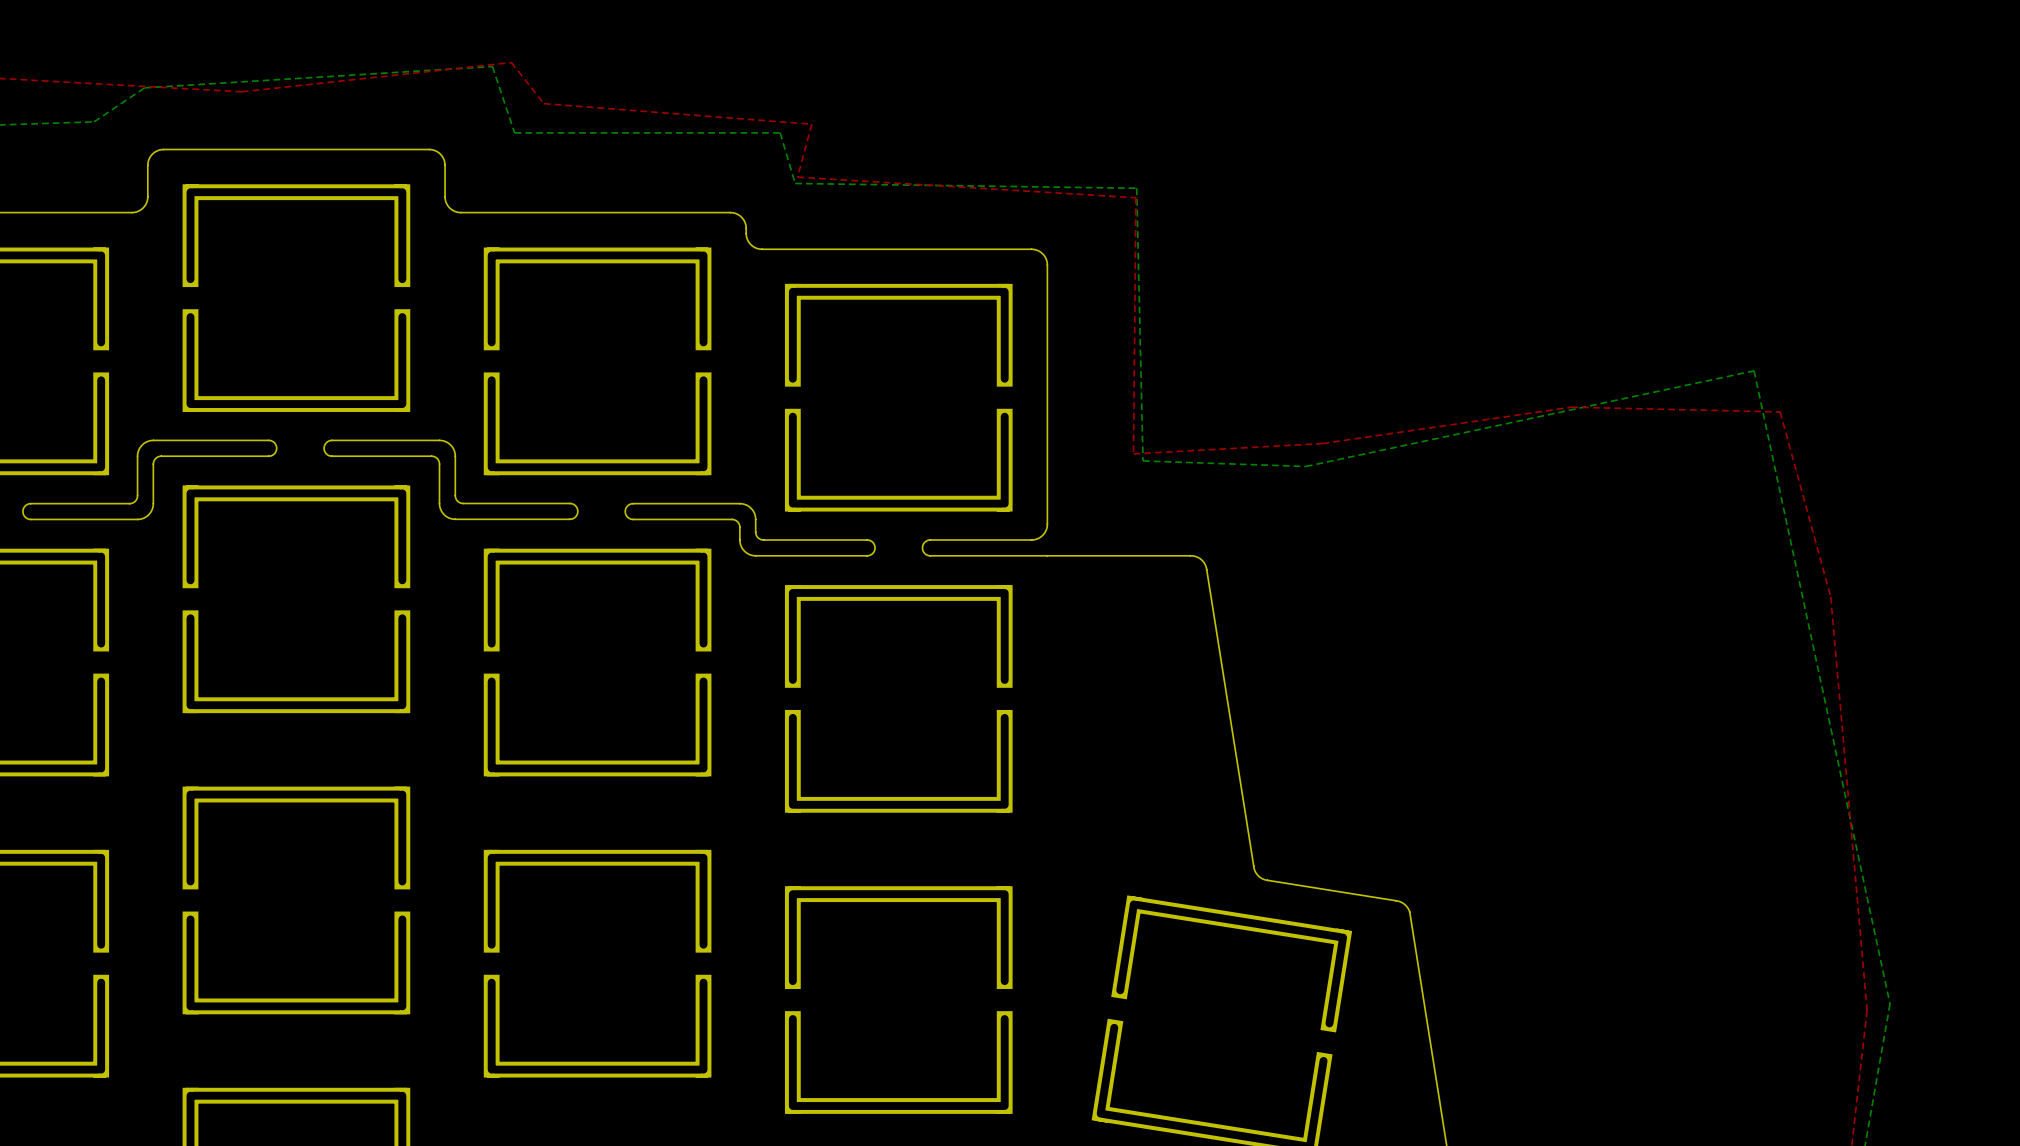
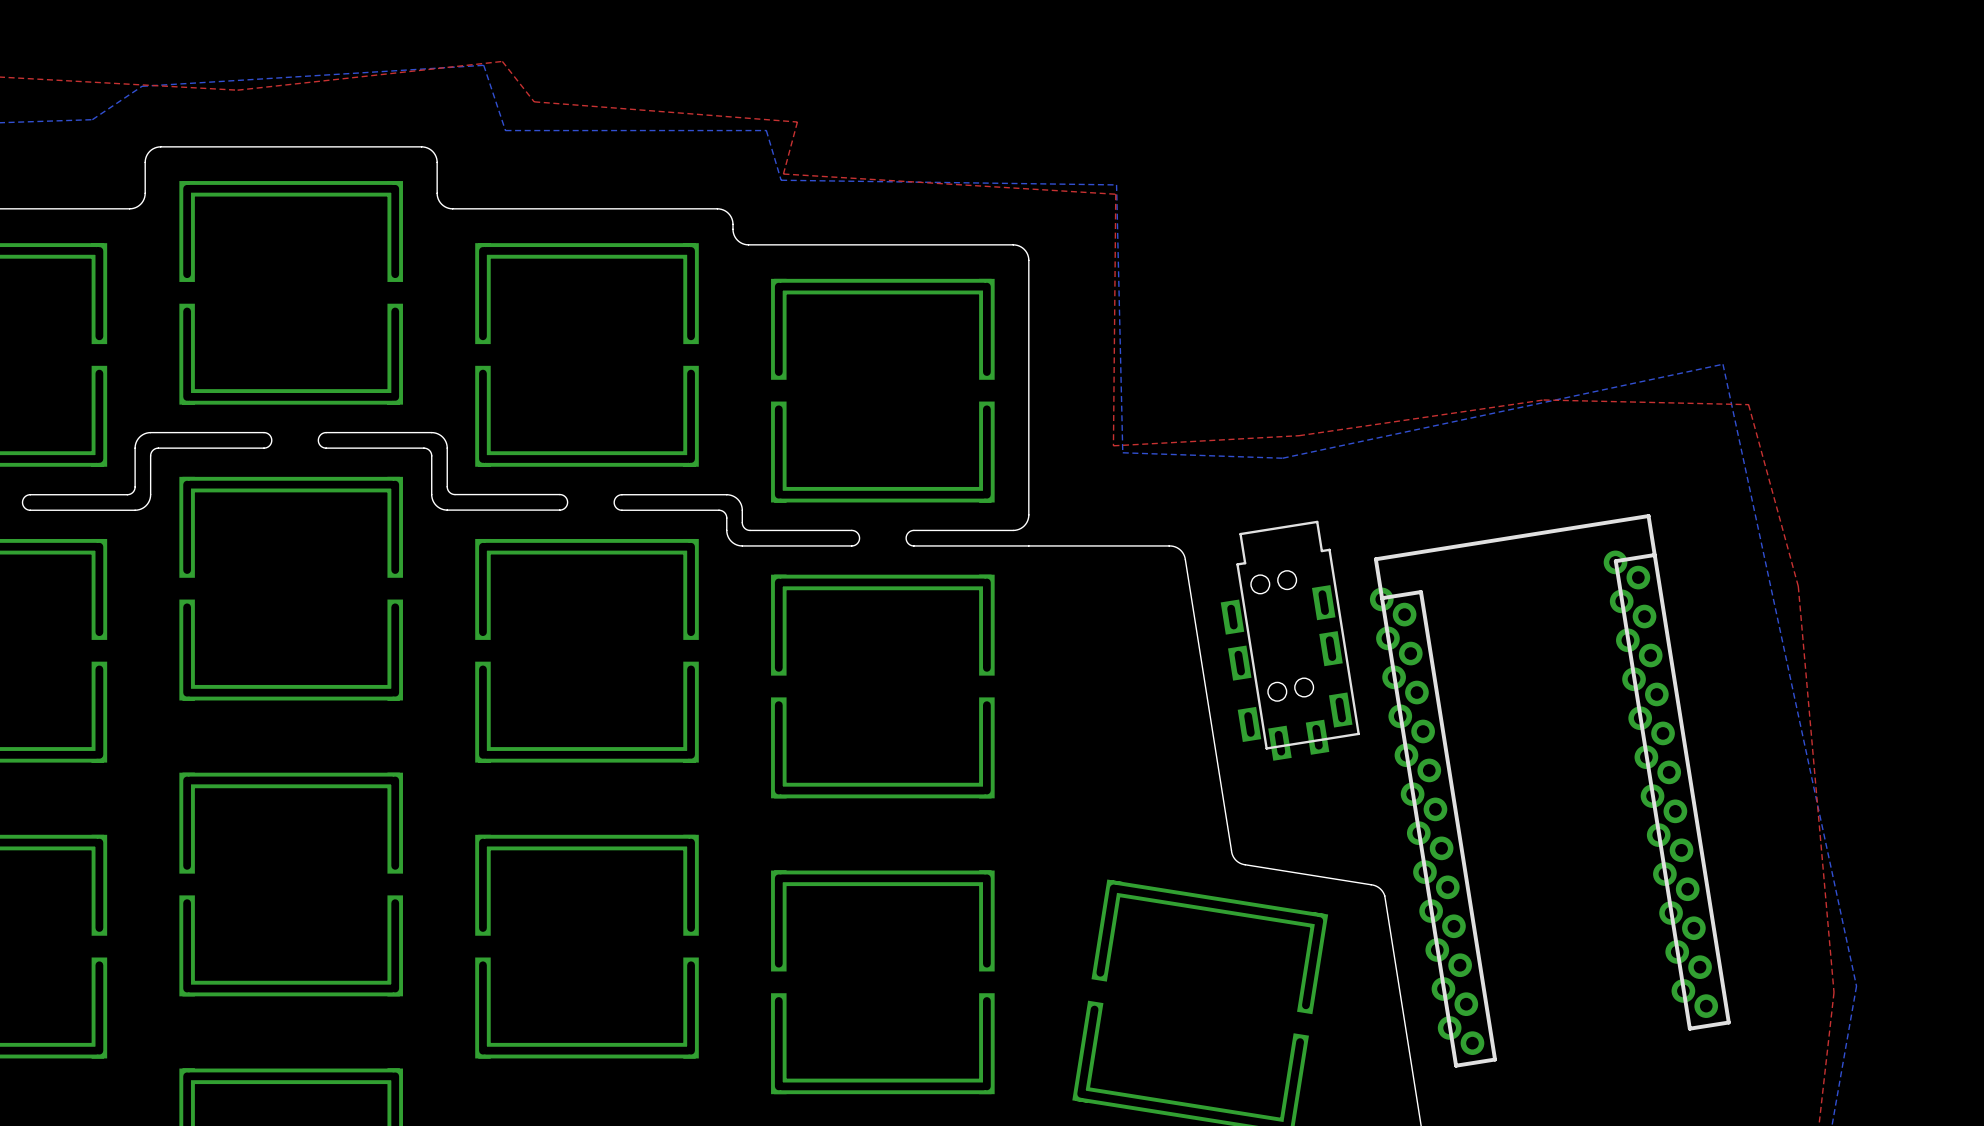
part: none -> (1290, 640)
part: none -> (1550, 790)

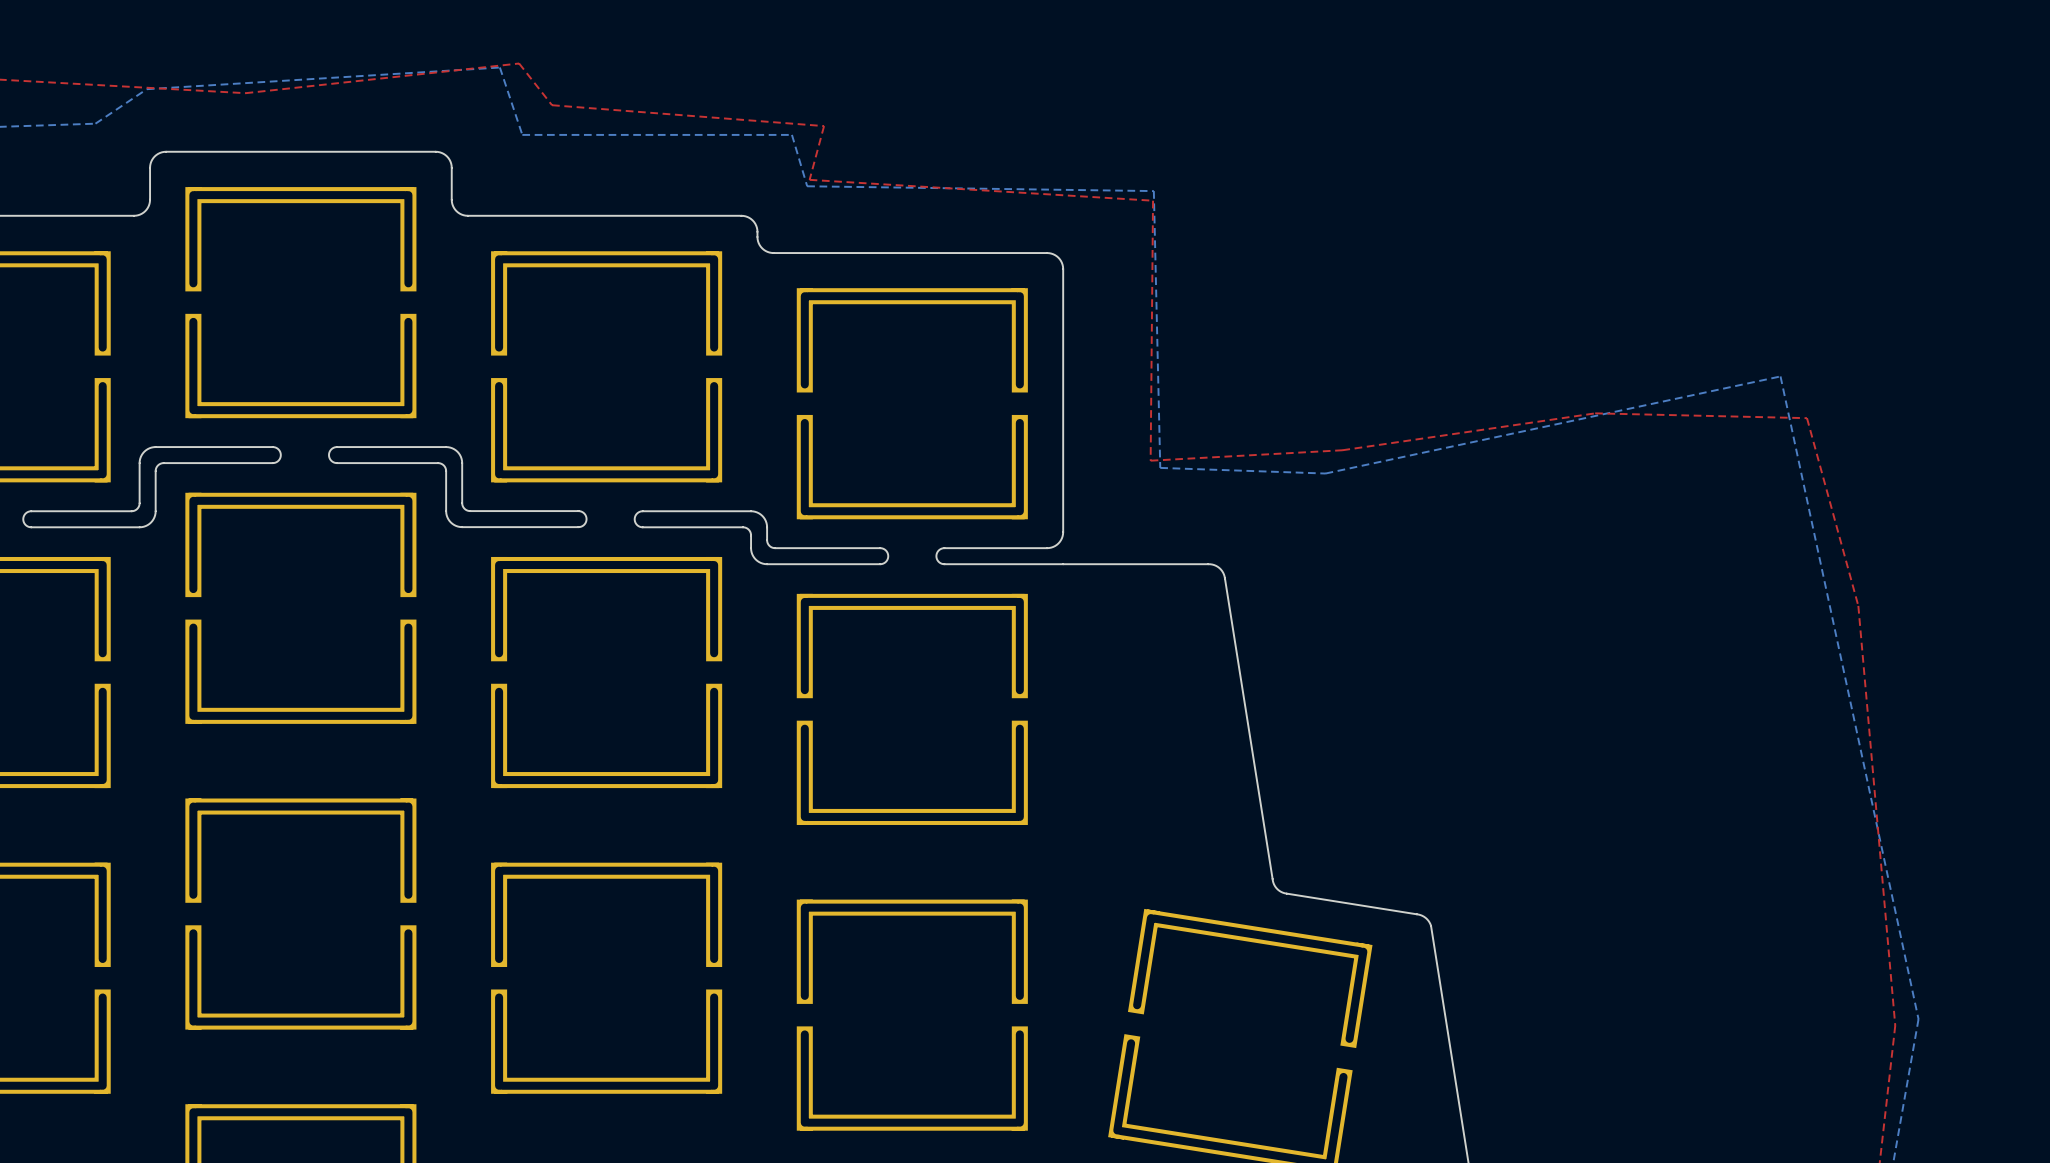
part: (1290, 640) -> none
part: (1550, 790) -> none

